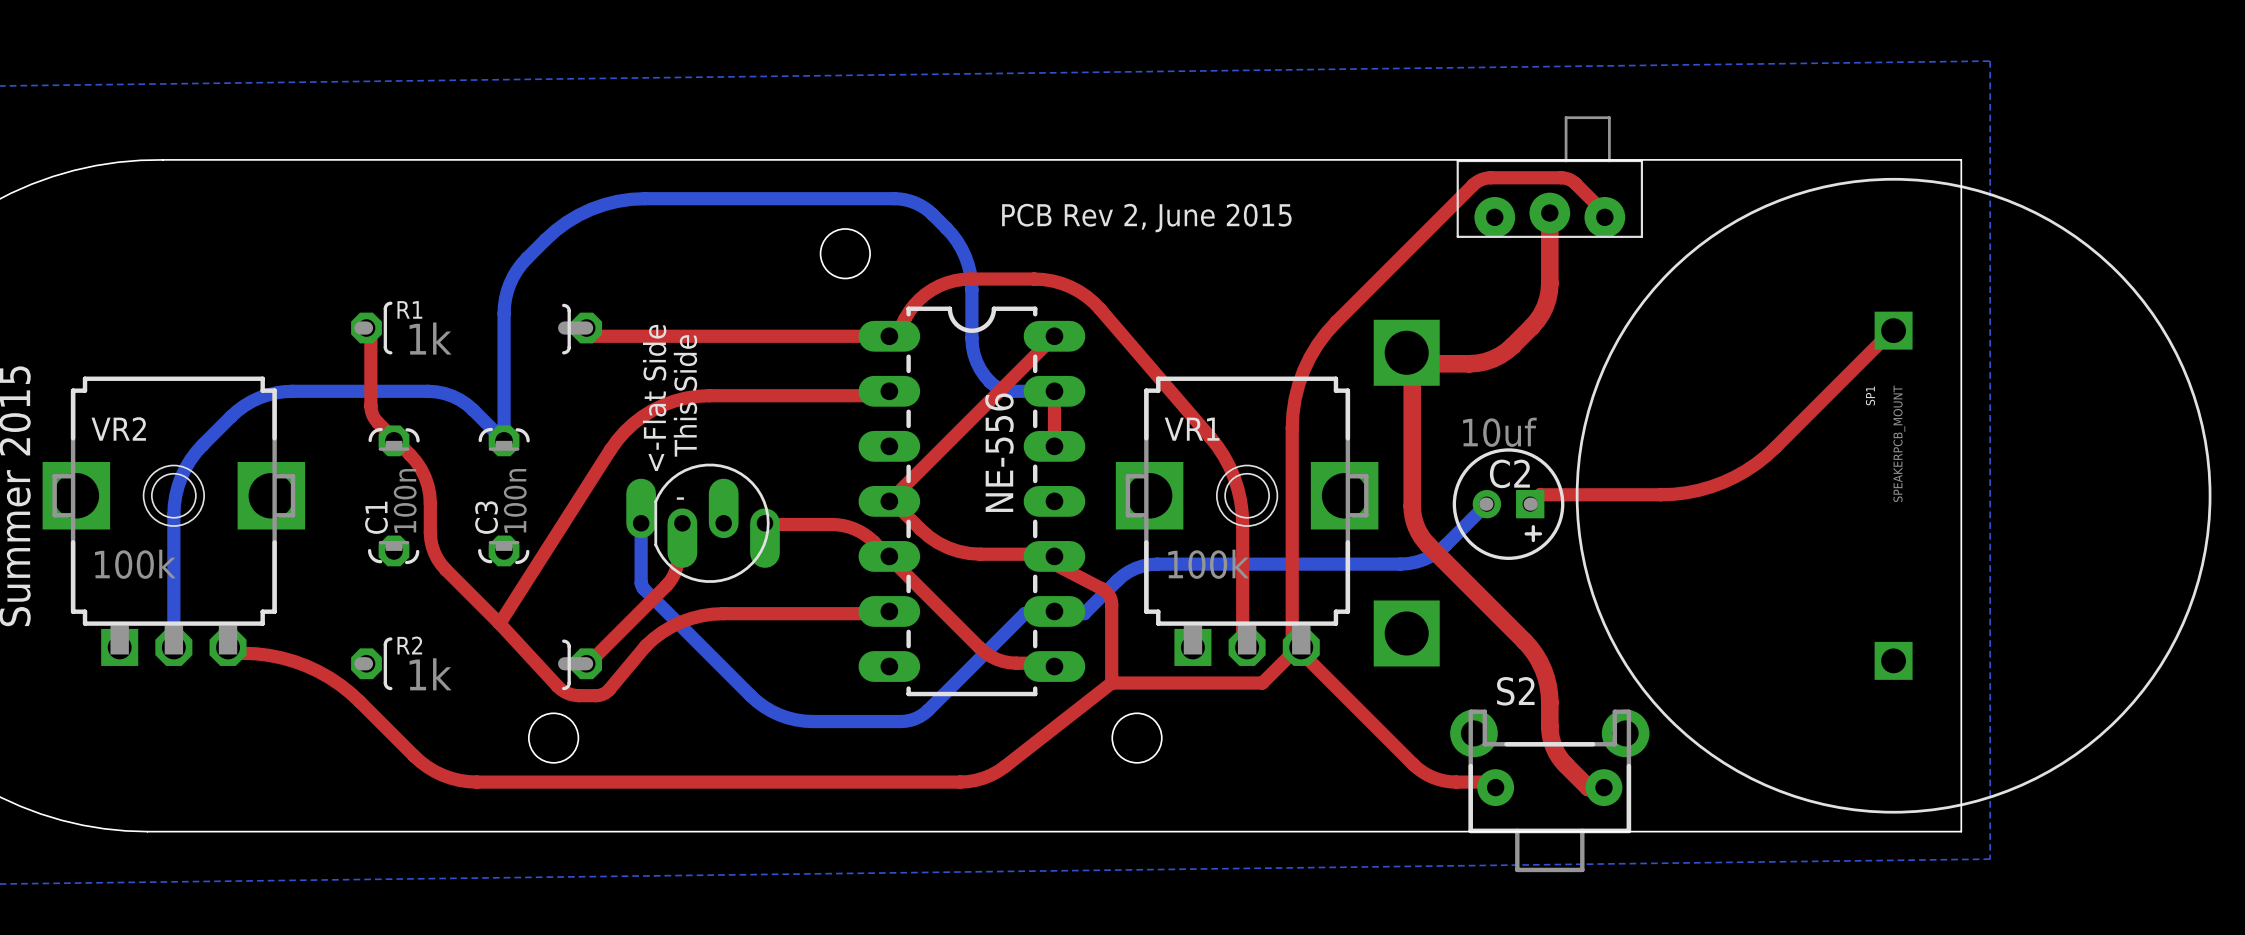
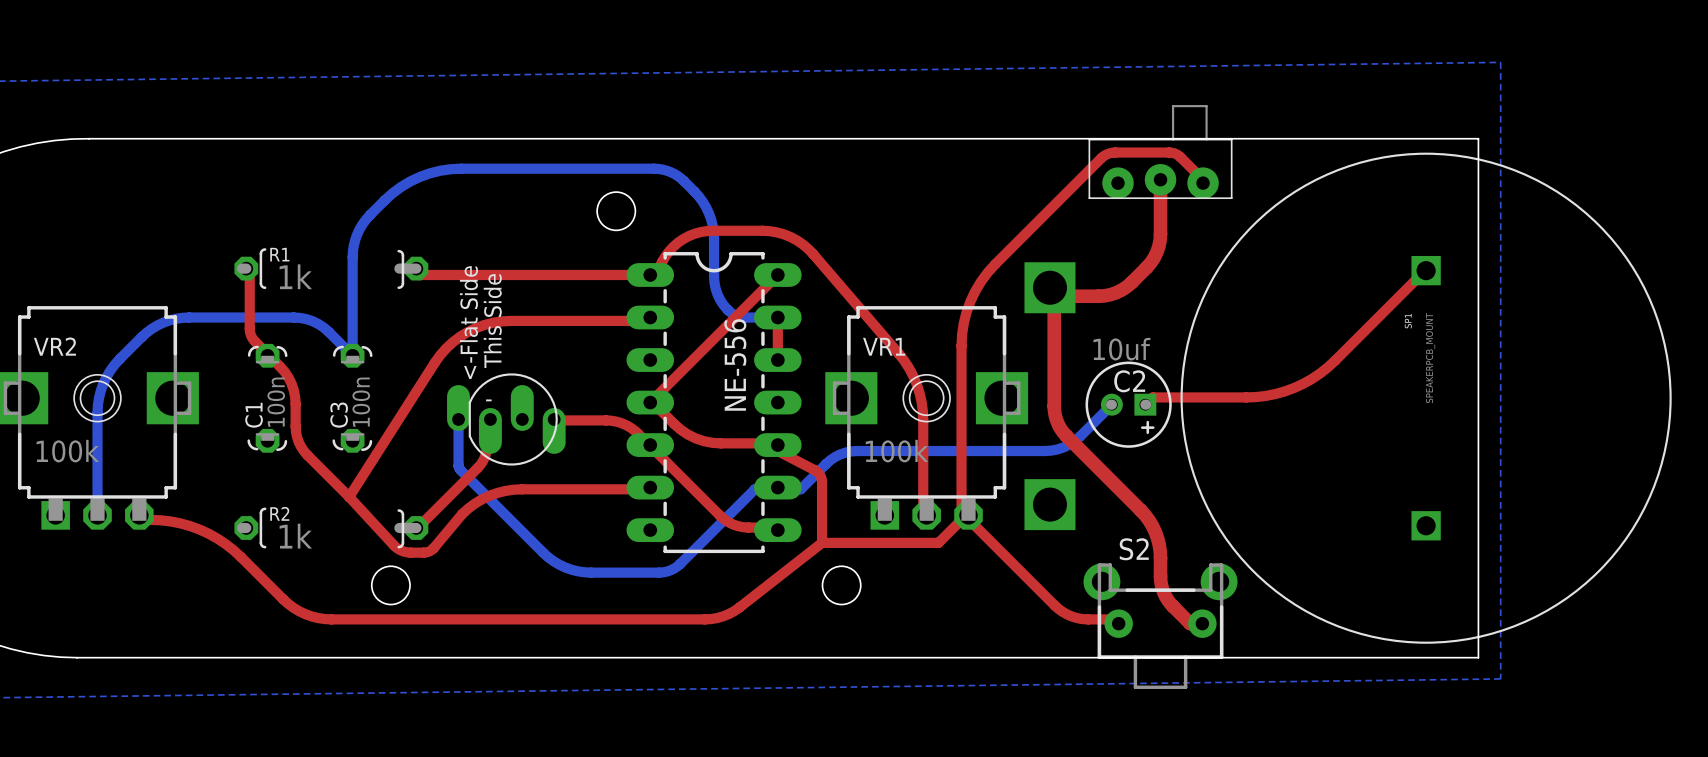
text: PCB Rev 2, June 2015 (1146, 218) -> none

